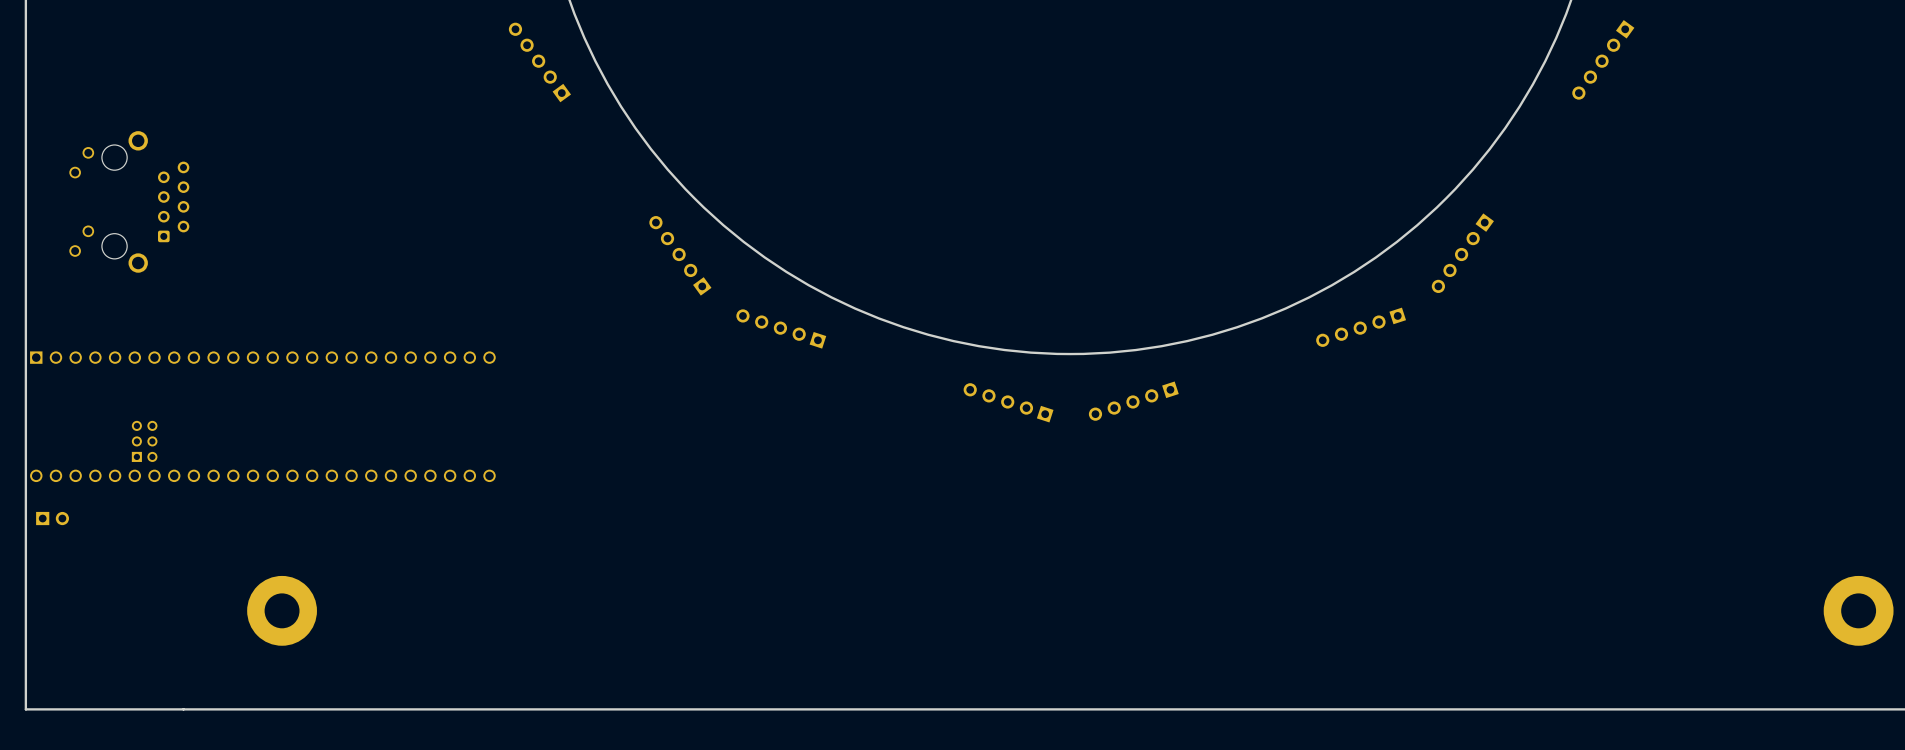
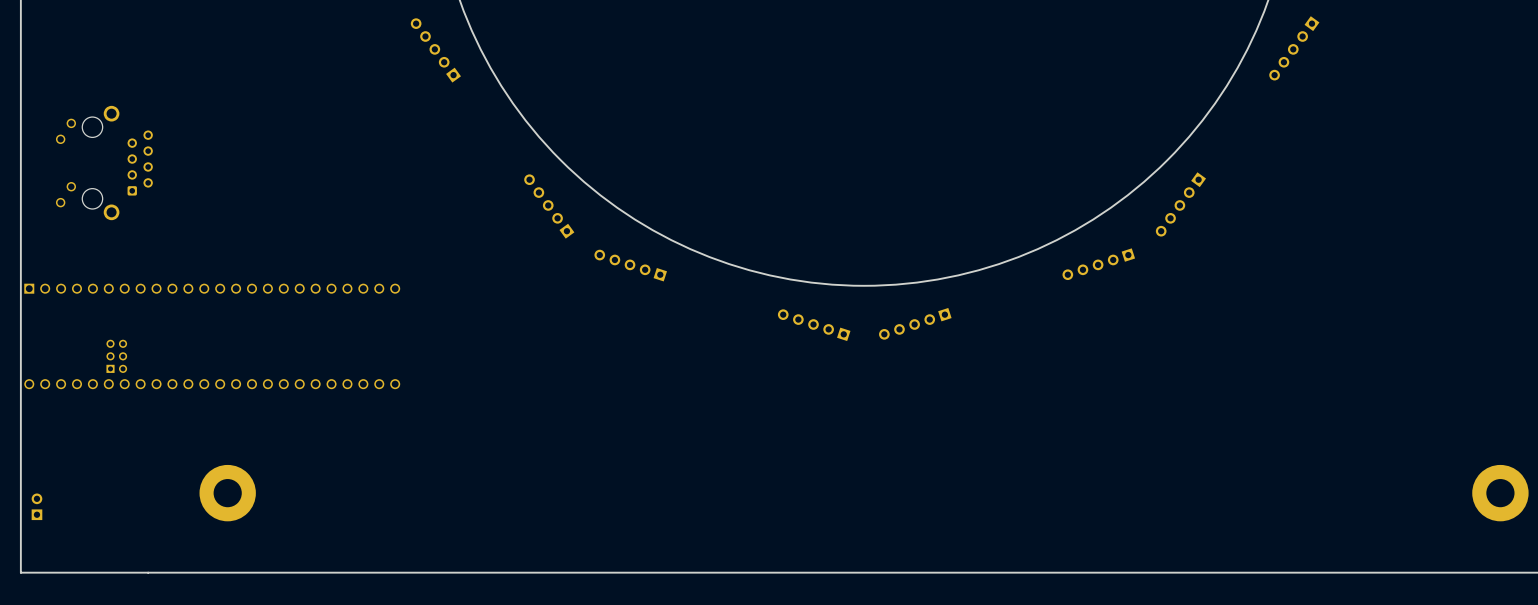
part rotation: 0° (52, 518) -> 90° counterclockwise (36, 506)
part position: (52, 518) -> (36, 506)

